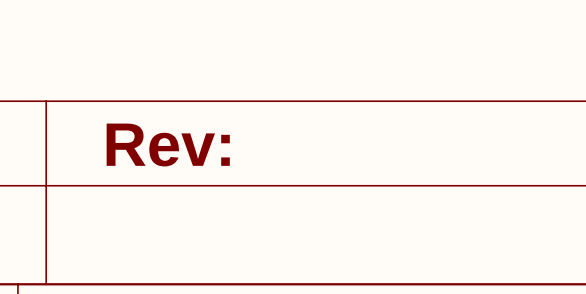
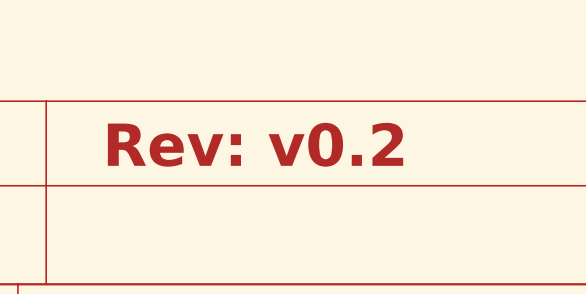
title block: Rev: (168, 145) -> Rev: v0.2 (255, 144)

